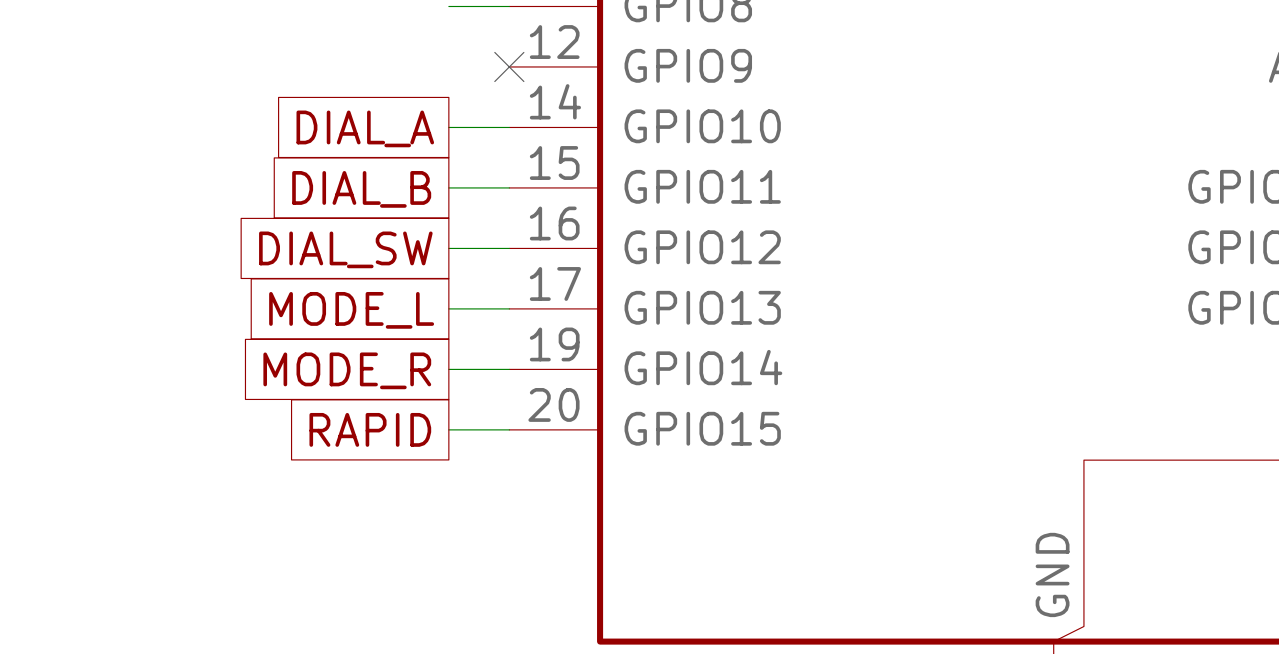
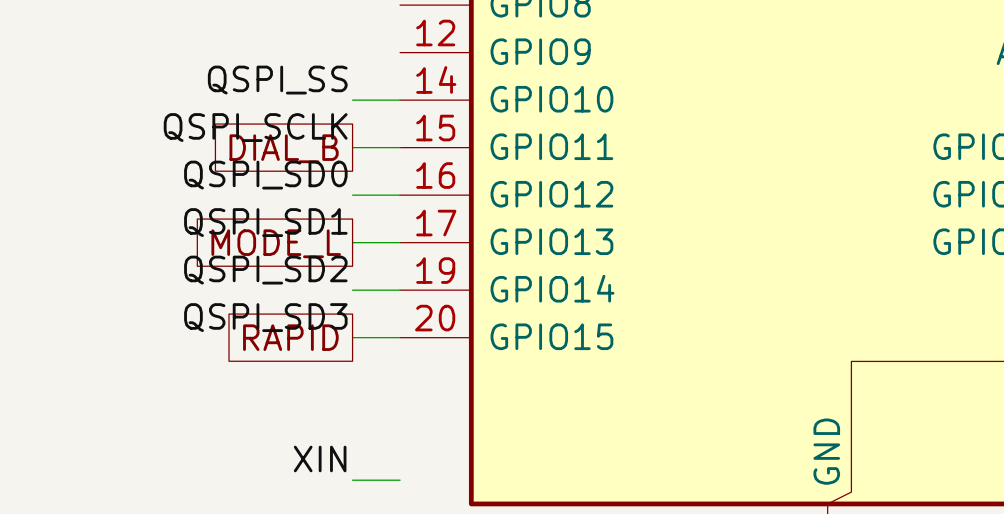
wire: (448, 6) (509, 6) -> none
no-connect mark: (509, 66) -> none
label: none -> QSPI_SS (277, 80)
global label: DIAL_A (365, 128) -> none
label: none -> QSPI_SCLK (255, 127)
label: none -> QSPI_SD0 (265, 175)
global label: DIAL_SW (345, 249) -> none
label: none -> QSPI_SD1 (265, 222)
label: none -> QSPI_SD2 (265, 270)
global label: MODE_R (347, 370) -> none
label: none -> QSPI_SD3 (265, 317)
label: none -> XIN (320, 458)
wire: none -> (352, 480) (400, 480)

